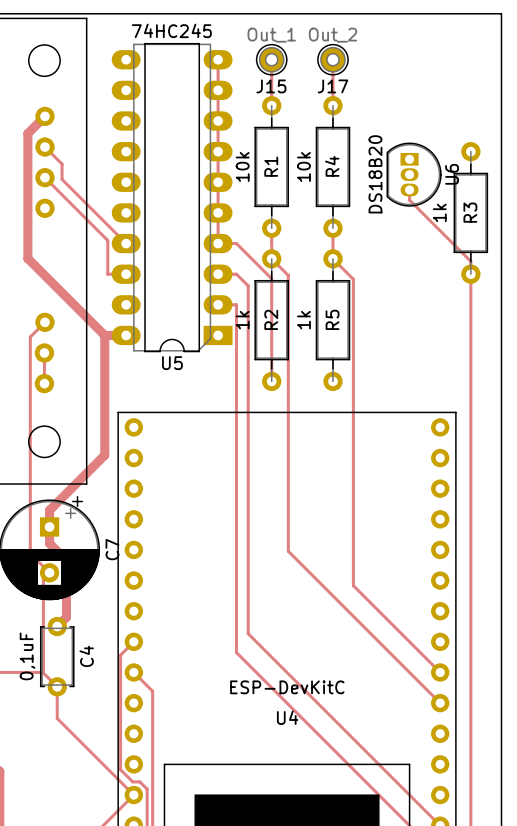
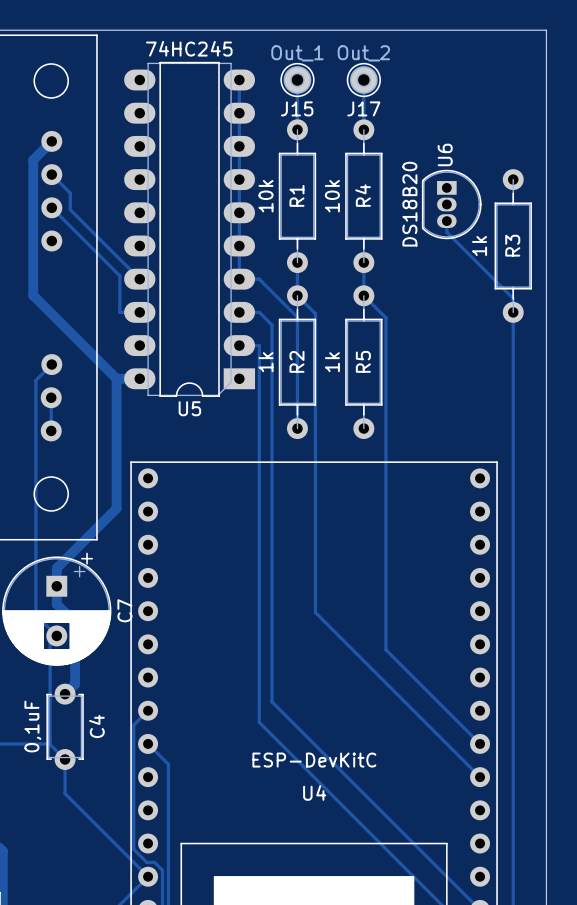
U6 name position: U6 (452, 174) -> U6 (445, 154)

